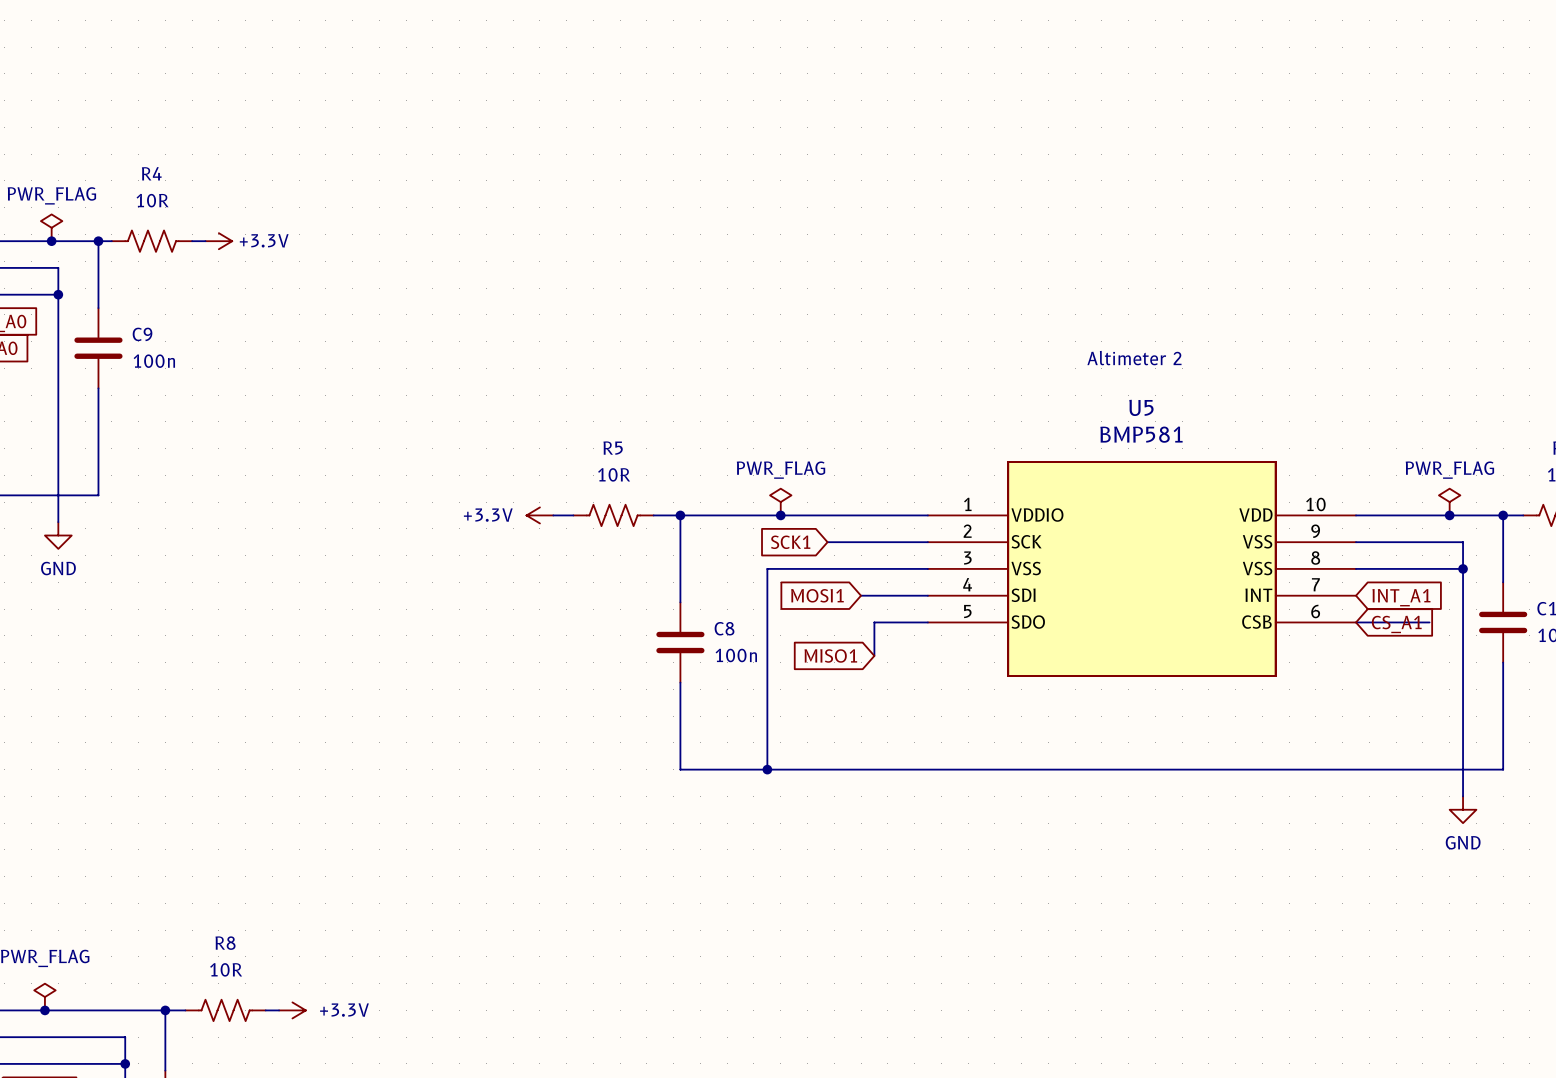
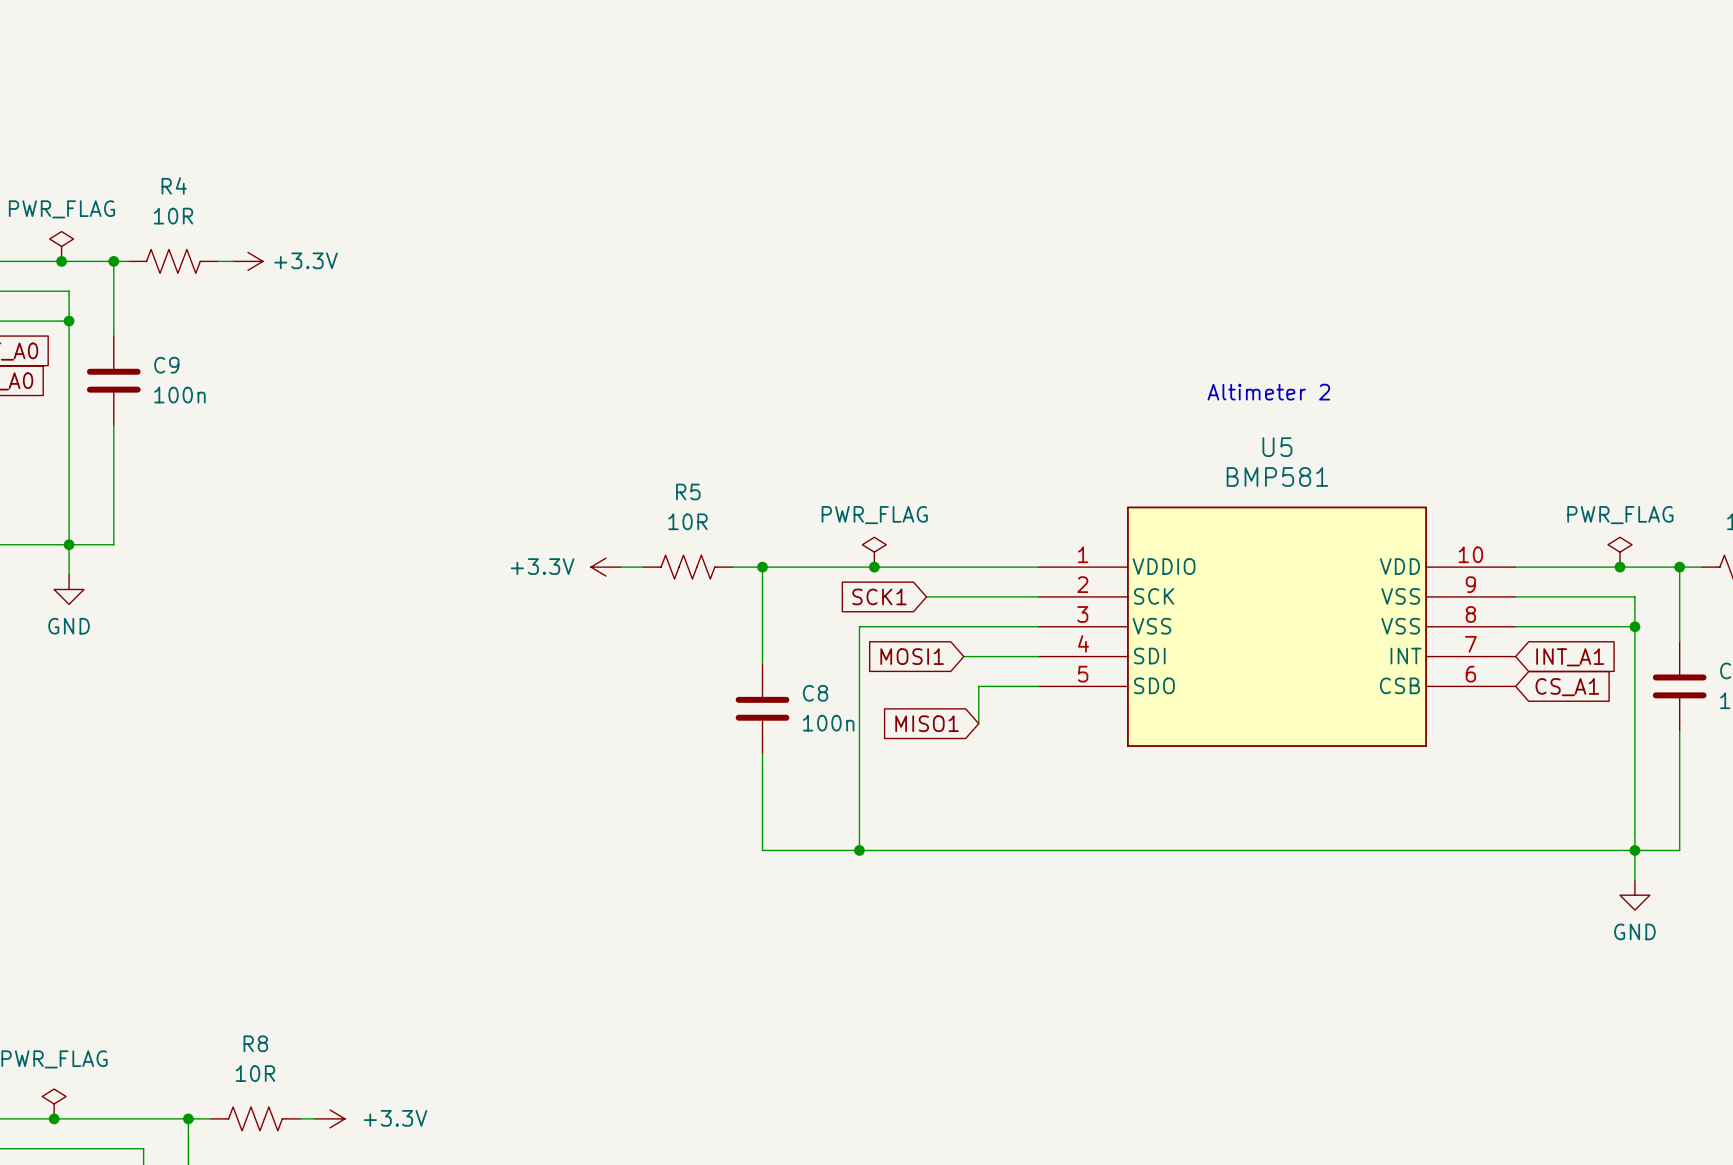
junction: none -> (69, 544)
wire: (1356, 622) (1429, 622) -> none
junction: none -> (1634, 850)

